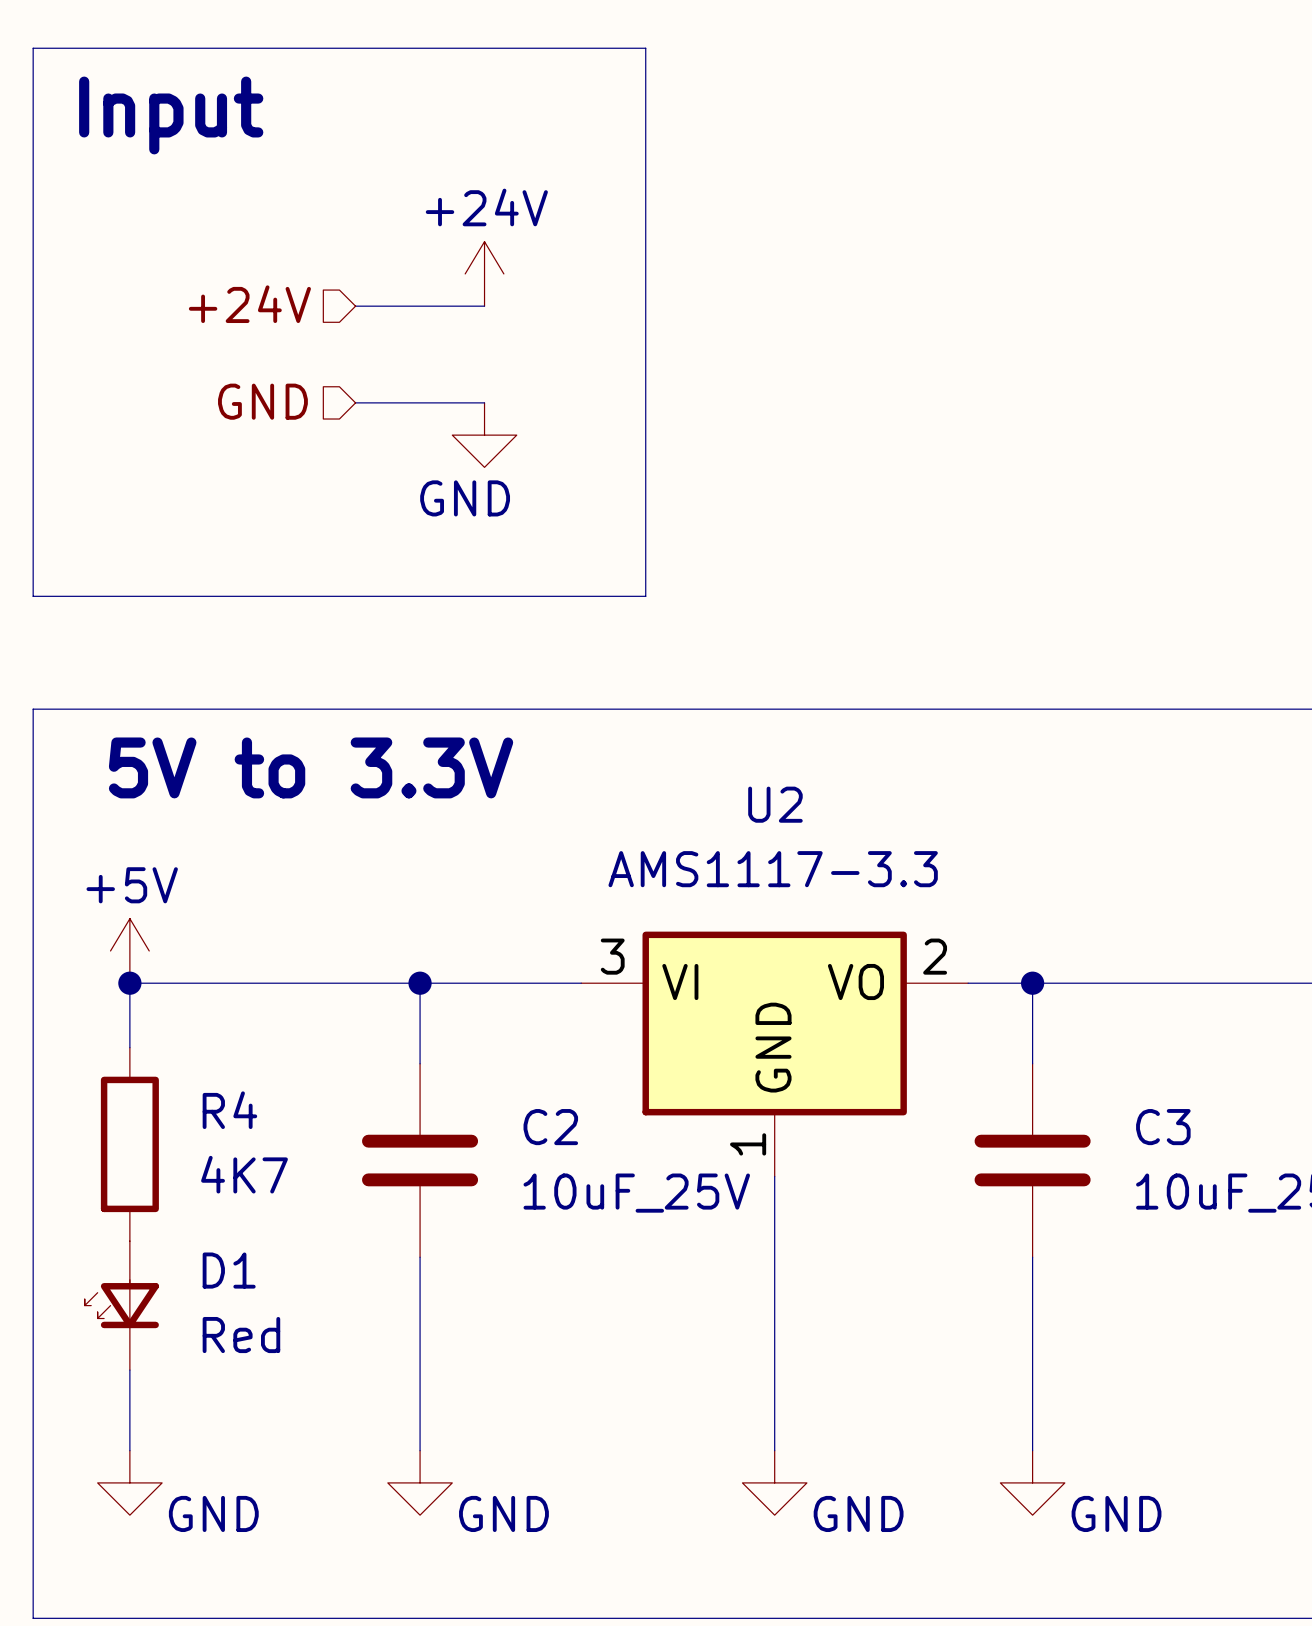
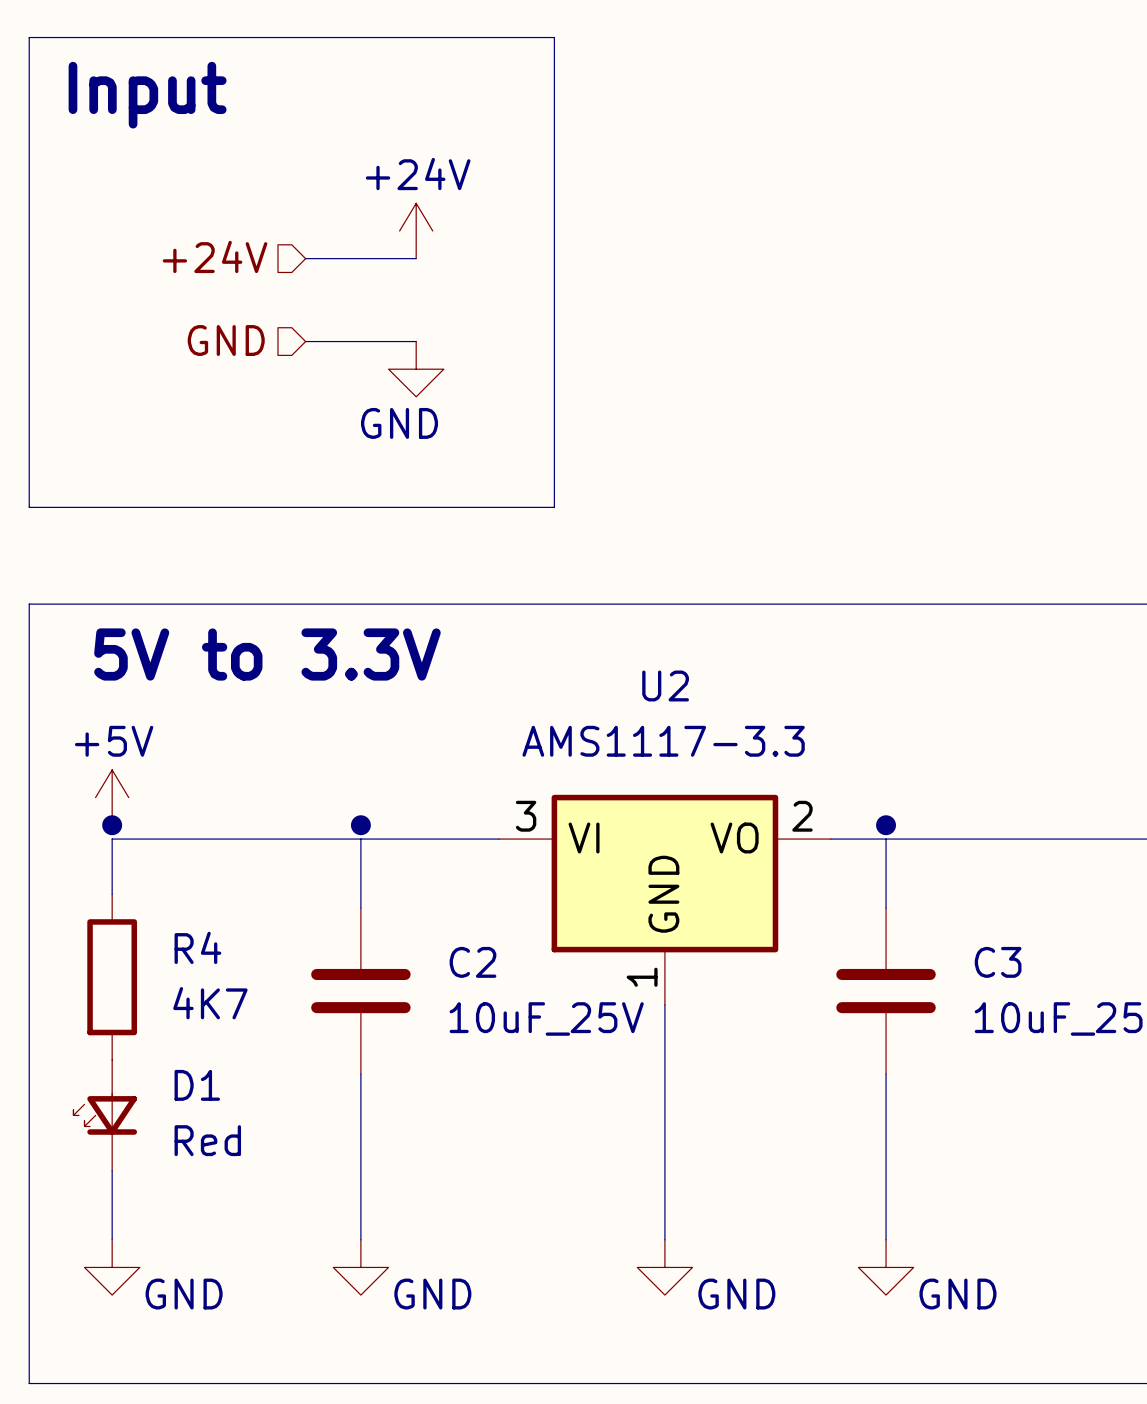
power symbol position: +5V (129, 950) -> +5V (112, 797)
junction position: (129, 983) -> (112, 825)
junction position: (420, 983) -> (360, 825)
junction position: (1032, 983) -> (886, 825)

